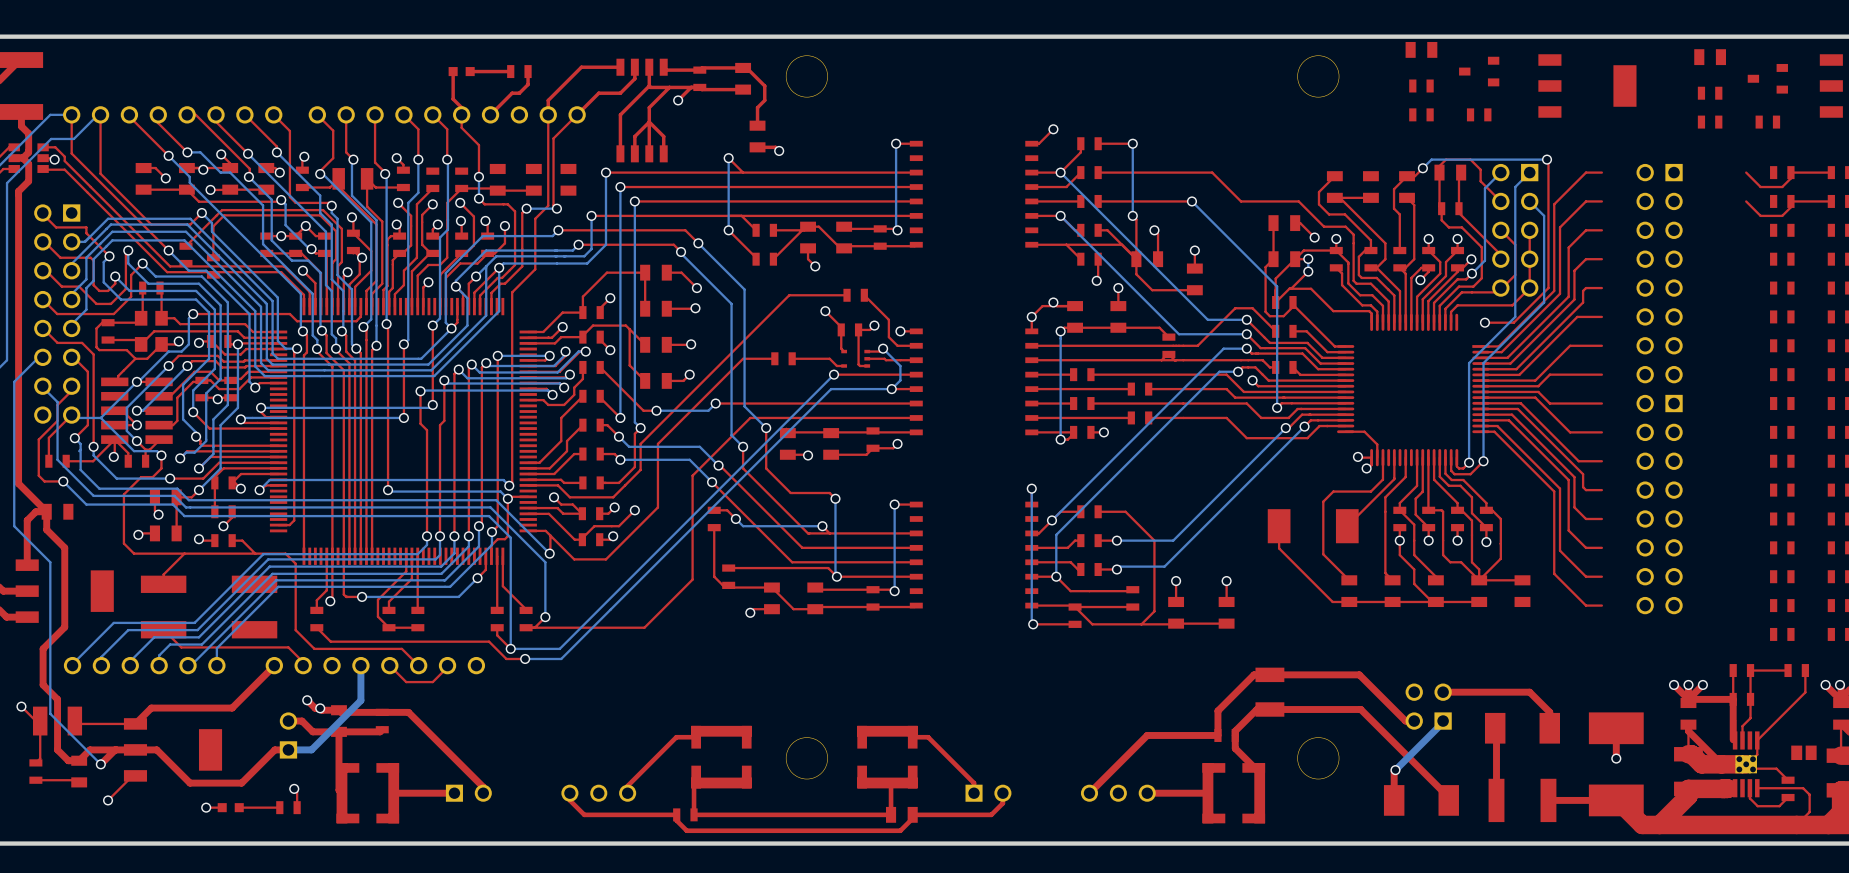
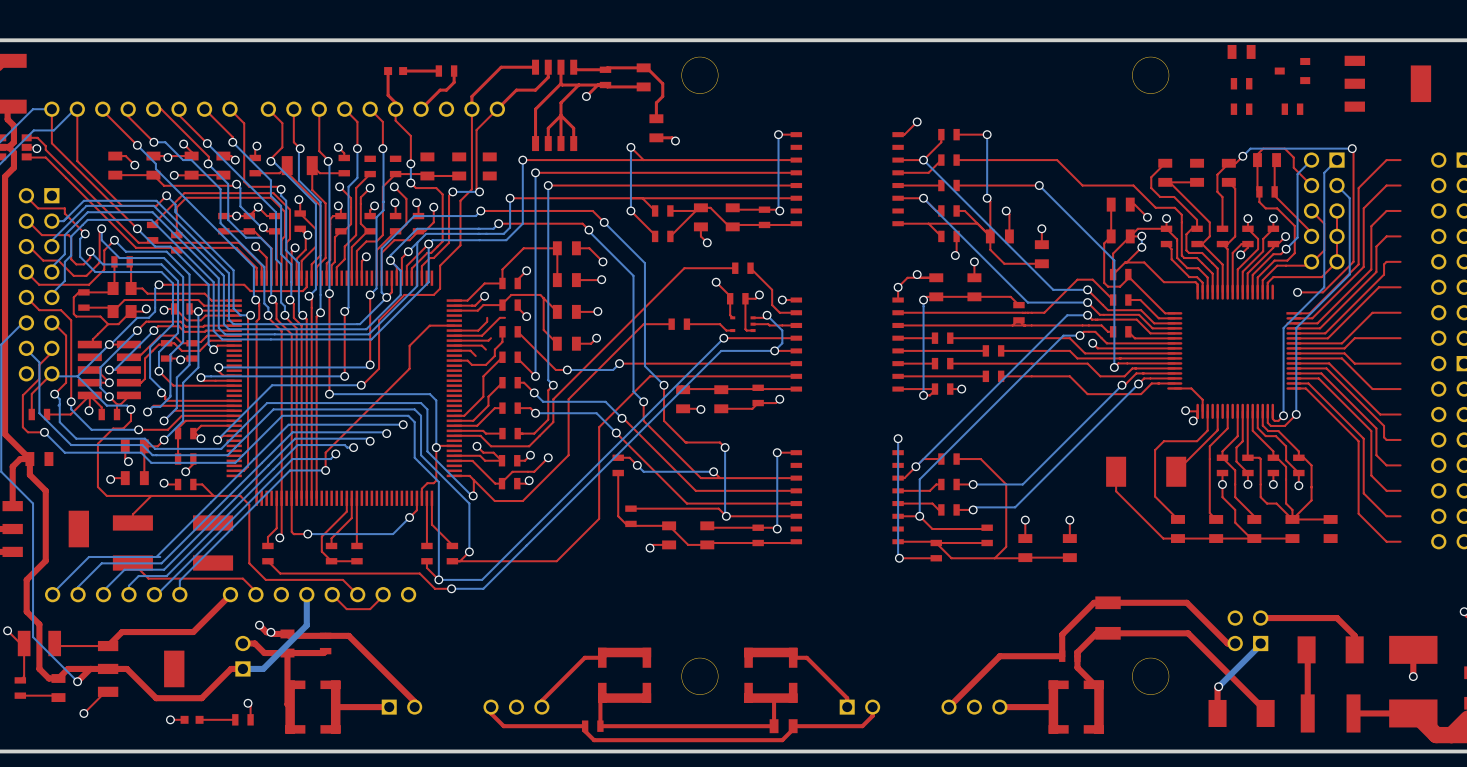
top track: (512, 318) (512, 482) (509, 485) -> (440, 288) (433, 294) (404, 294) (379, 320) (379, 368) (361, 385)
top track: (386, 324) (388, 490) -> (329, 293) (329, 394)
bottom track: (565, 351) (565, 354) (554, 365) (489, 365) (486, 363) -> none
via: (565, 351) -> none
bottom track: (585, 351) (578, 351) (557, 372) (479, 372) (471, 364) -> none
via: (585, 351) -> none
top track: (497, 355) (497, 526) (491, 531) -> none
via: (497, 355) -> none
top track: (549, 355) (545, 360) (528, 360) -> (325, 470) (325, 452) (409, 368) (409, 345) (429, 325) (454, 325)
bottom track: (549, 355) (497, 355) -> none
via: (549, 355) -> none
top track: (486, 363) (481, 367) (481, 523) (478, 526) -> none
via: (486, 363) -> none
top track: (471, 364) (468, 367) (468, 536) -> none
via: (471, 364) -> none
top track: (458, 369) (454, 373) (454, 536) -> none
bottom track: (458, 369) (467, 378) (566, 378) (569, 374) -> none
via: (458, 369) -> none
via: (569, 374) -> none
top track: (444, 380) (444, 420) (440, 425) (440, 536) -> none
bottom track: (444, 380) (447, 383) (560, 383) (564, 387) -> none
via: (444, 380) -> none
via: (564, 387) -> none
top track: (420, 391) (420, 423) (427, 430) (427, 536) -> none
bottom track: (420, 391) (548, 390) (552, 394) -> none
via: (420, 391) -> none
via: (552, 394) -> none
via: none -> (361, 385)
via: none -> (329, 394)
bottom track: none -> (403, 424) (288, 424) (156, 556)
via: none -> (403, 424)
bottom track: (269, 480) (503, 480) (509, 485) -> (226, 431) (272, 385) (361, 385)
via: none -> (386, 433)
via: (509, 485) -> none
bottom track: (388, 490) (500, 491) (507, 498) -> (329, 394) (429, 394) (436, 400) (436, 447)
via: (388, 490) -> none
via: none -> (370, 441)
via: none -> (353, 447)
bottom track: (263, 500) (496, 500) (549, 553) -> (221, 448) (267, 403) (421, 403) (427, 409) (427, 451) (473, 495)
via: none -> (335, 453)
bottom track: (490, 507) (271, 507) -> (421, 455) (421, 415) (414, 409) (273, 409) (227, 455)
bottom track: (489, 516) (279, 516) -> (419, 462) (414, 457) (414, 422) (408, 415) (282, 415) (235, 462)
via: none -> (325, 470)
bottom track: (478, 526) (478, 546) (445, 580) (276, 580) -> (335, 453) (330, 459) (292, 459) (232, 519)
via: (478, 526) -> none
bottom track: (491, 531) (491, 544) (450, 586) (278, 586) (216, 649) -> (325, 470) (290, 470) (179, 580)
via: (491, 531) -> none
bottom track: (427, 536) (427, 544) (417, 554) (263, 554) (194, 622) -> none
via: (427, 536) -> none
bottom track: (440, 536) (440, 555) (435, 559) (268, 559) (196, 630) -> (386, 433) (292, 432) (161, 563)
via: (440, 536) -> none
bottom track: (454, 536) (454, 553) (441, 566) (269, 566) -> (370, 441) (367, 438) (295, 438) (226, 507)
via: (454, 536) -> none
bottom track: (468, 536) (468, 546) (441, 573) (272, 573) -> (353, 447) (347, 447) (344, 445) (297, 445) (228, 513)
via: (468, 536) -> none

